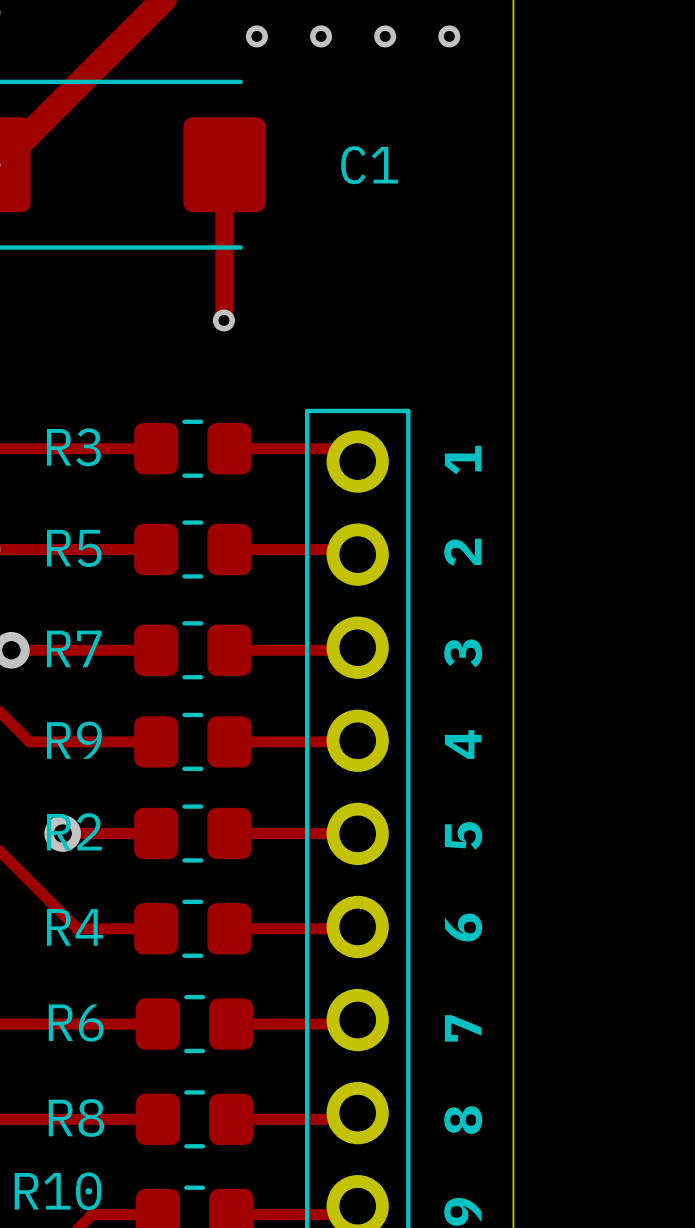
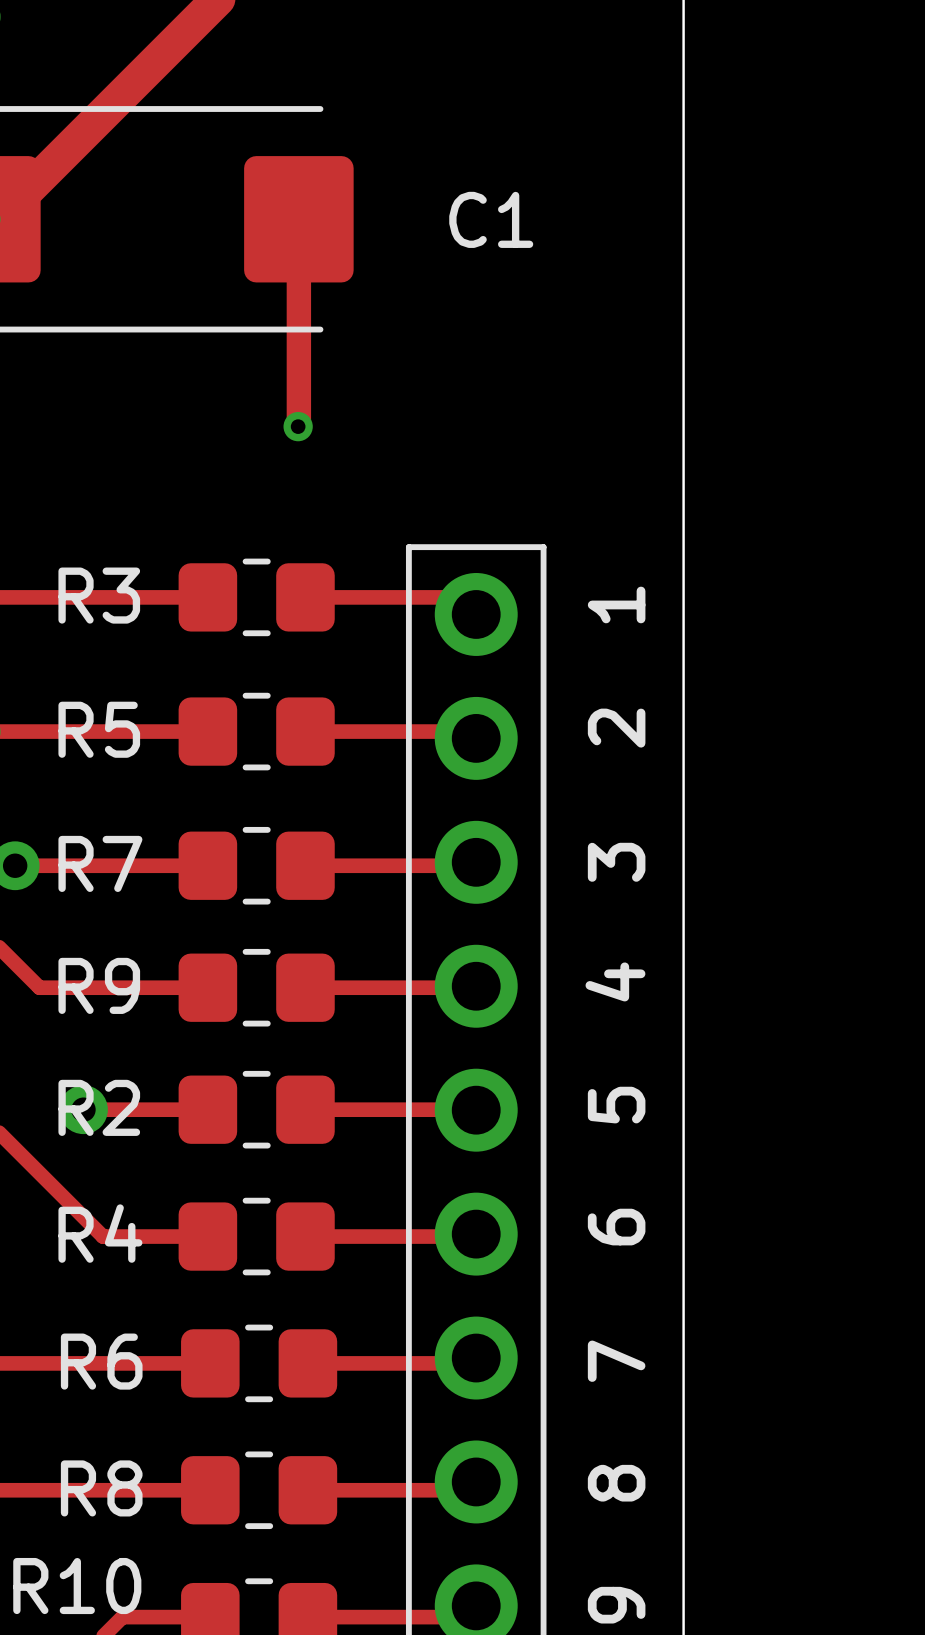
via: (256, 36) -> none
via: (321, 36) -> none
via: (385, 36) -> none
via: (449, 36) -> none

